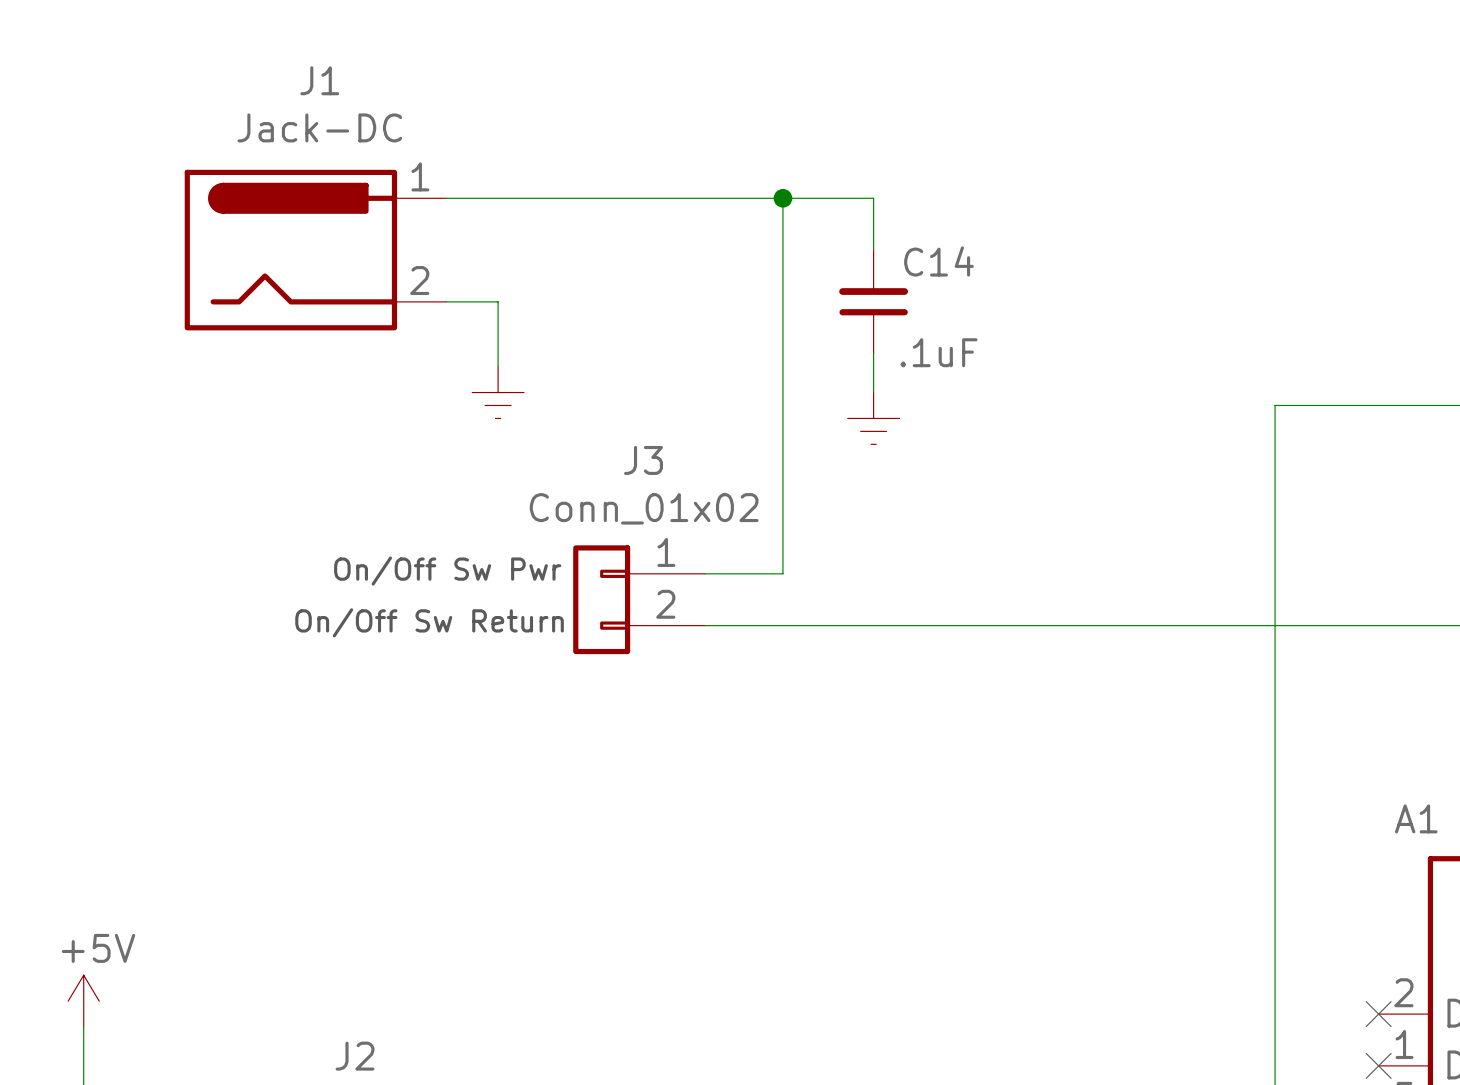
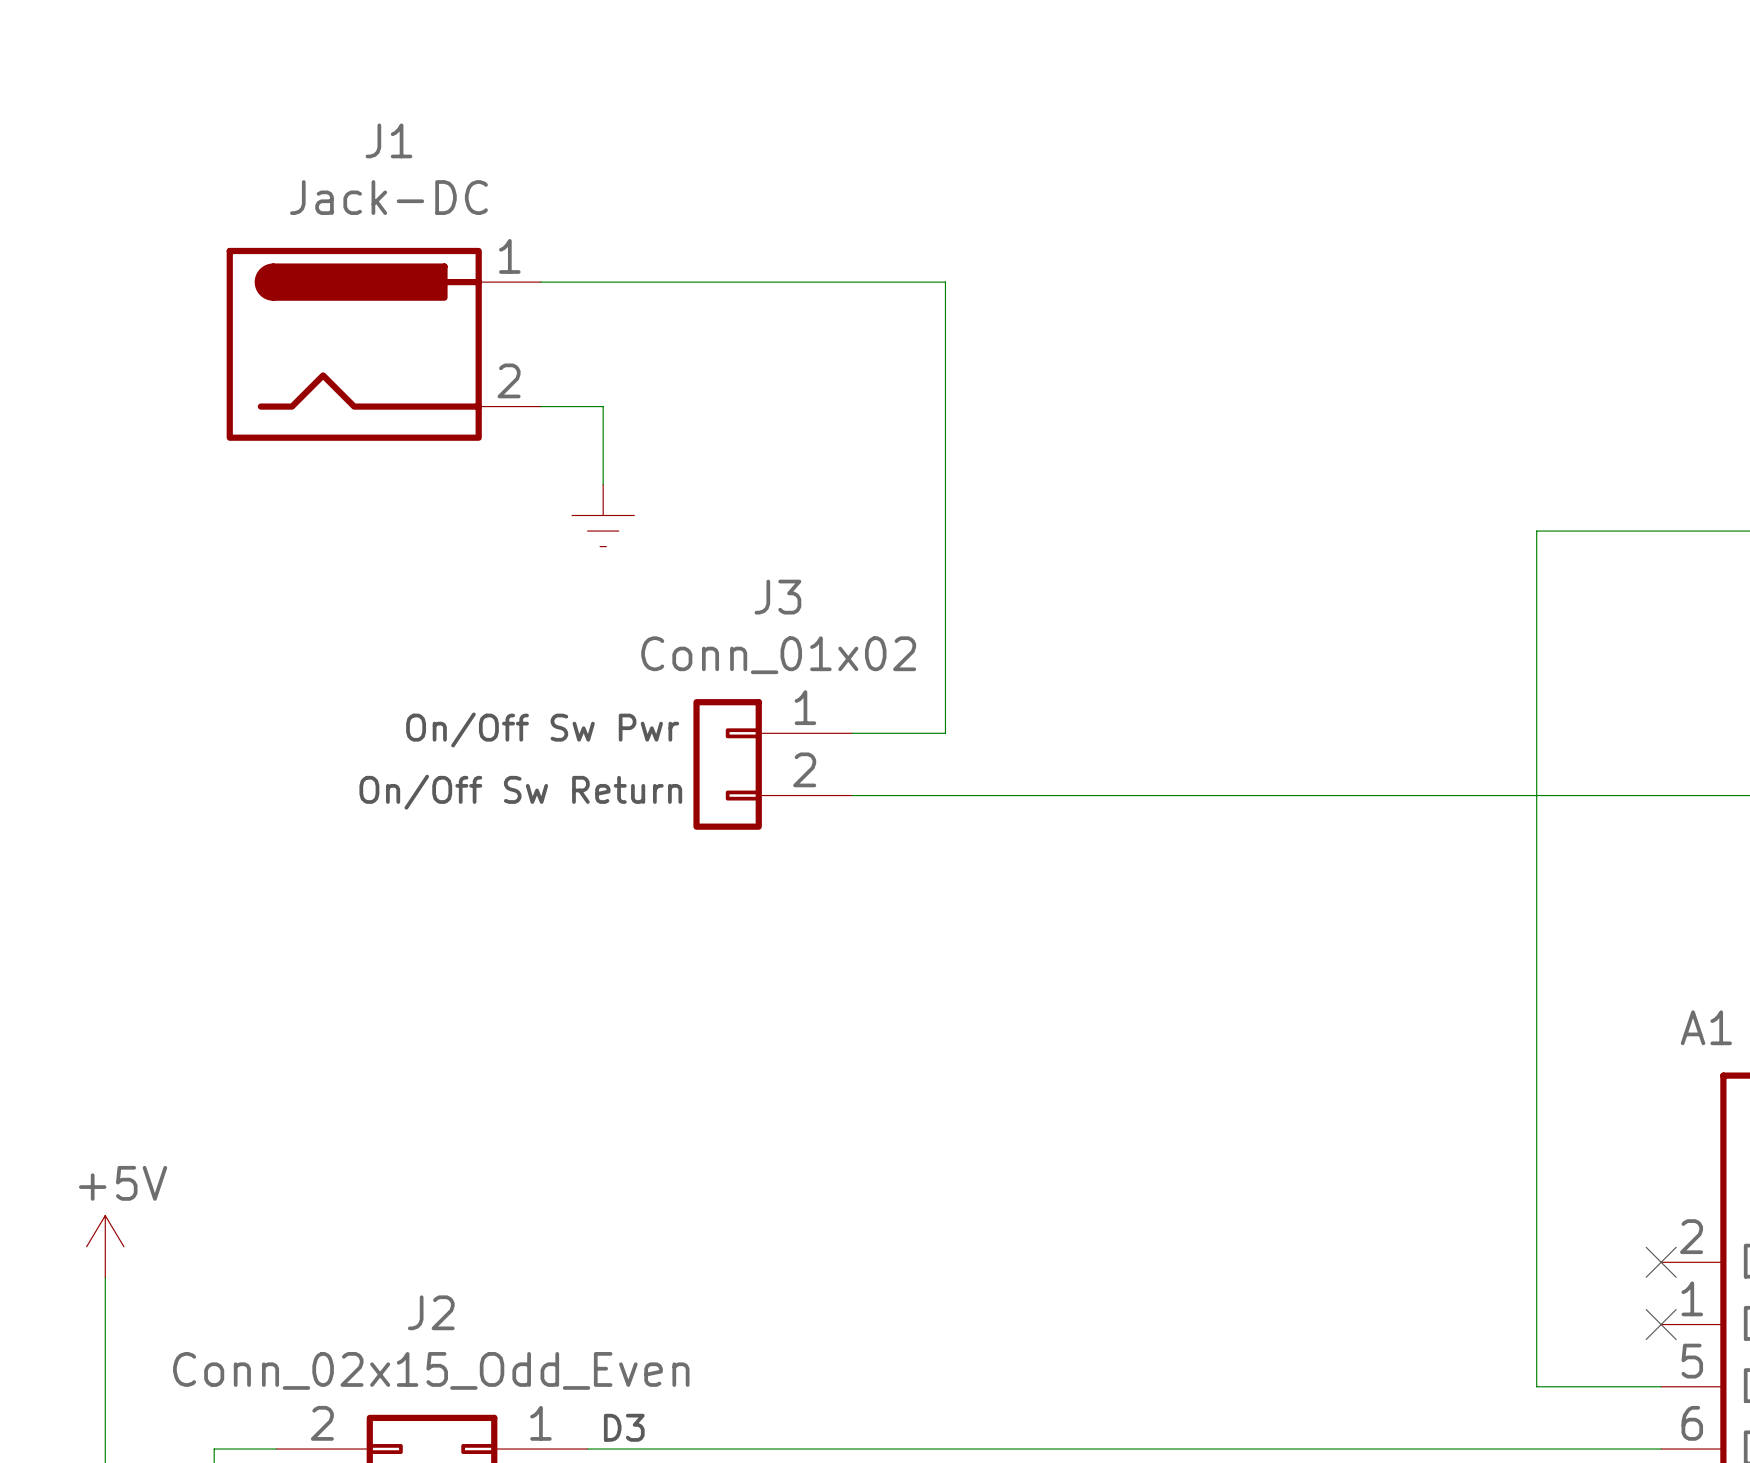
wire: (782, 198) (873, 198) (873, 250) -> none
junction: (782, 198) -> none
C14: .1uF (873, 301) -> none
wire: (873, 353) (873, 392) -> none
power symbol: (873, 418) -> none

